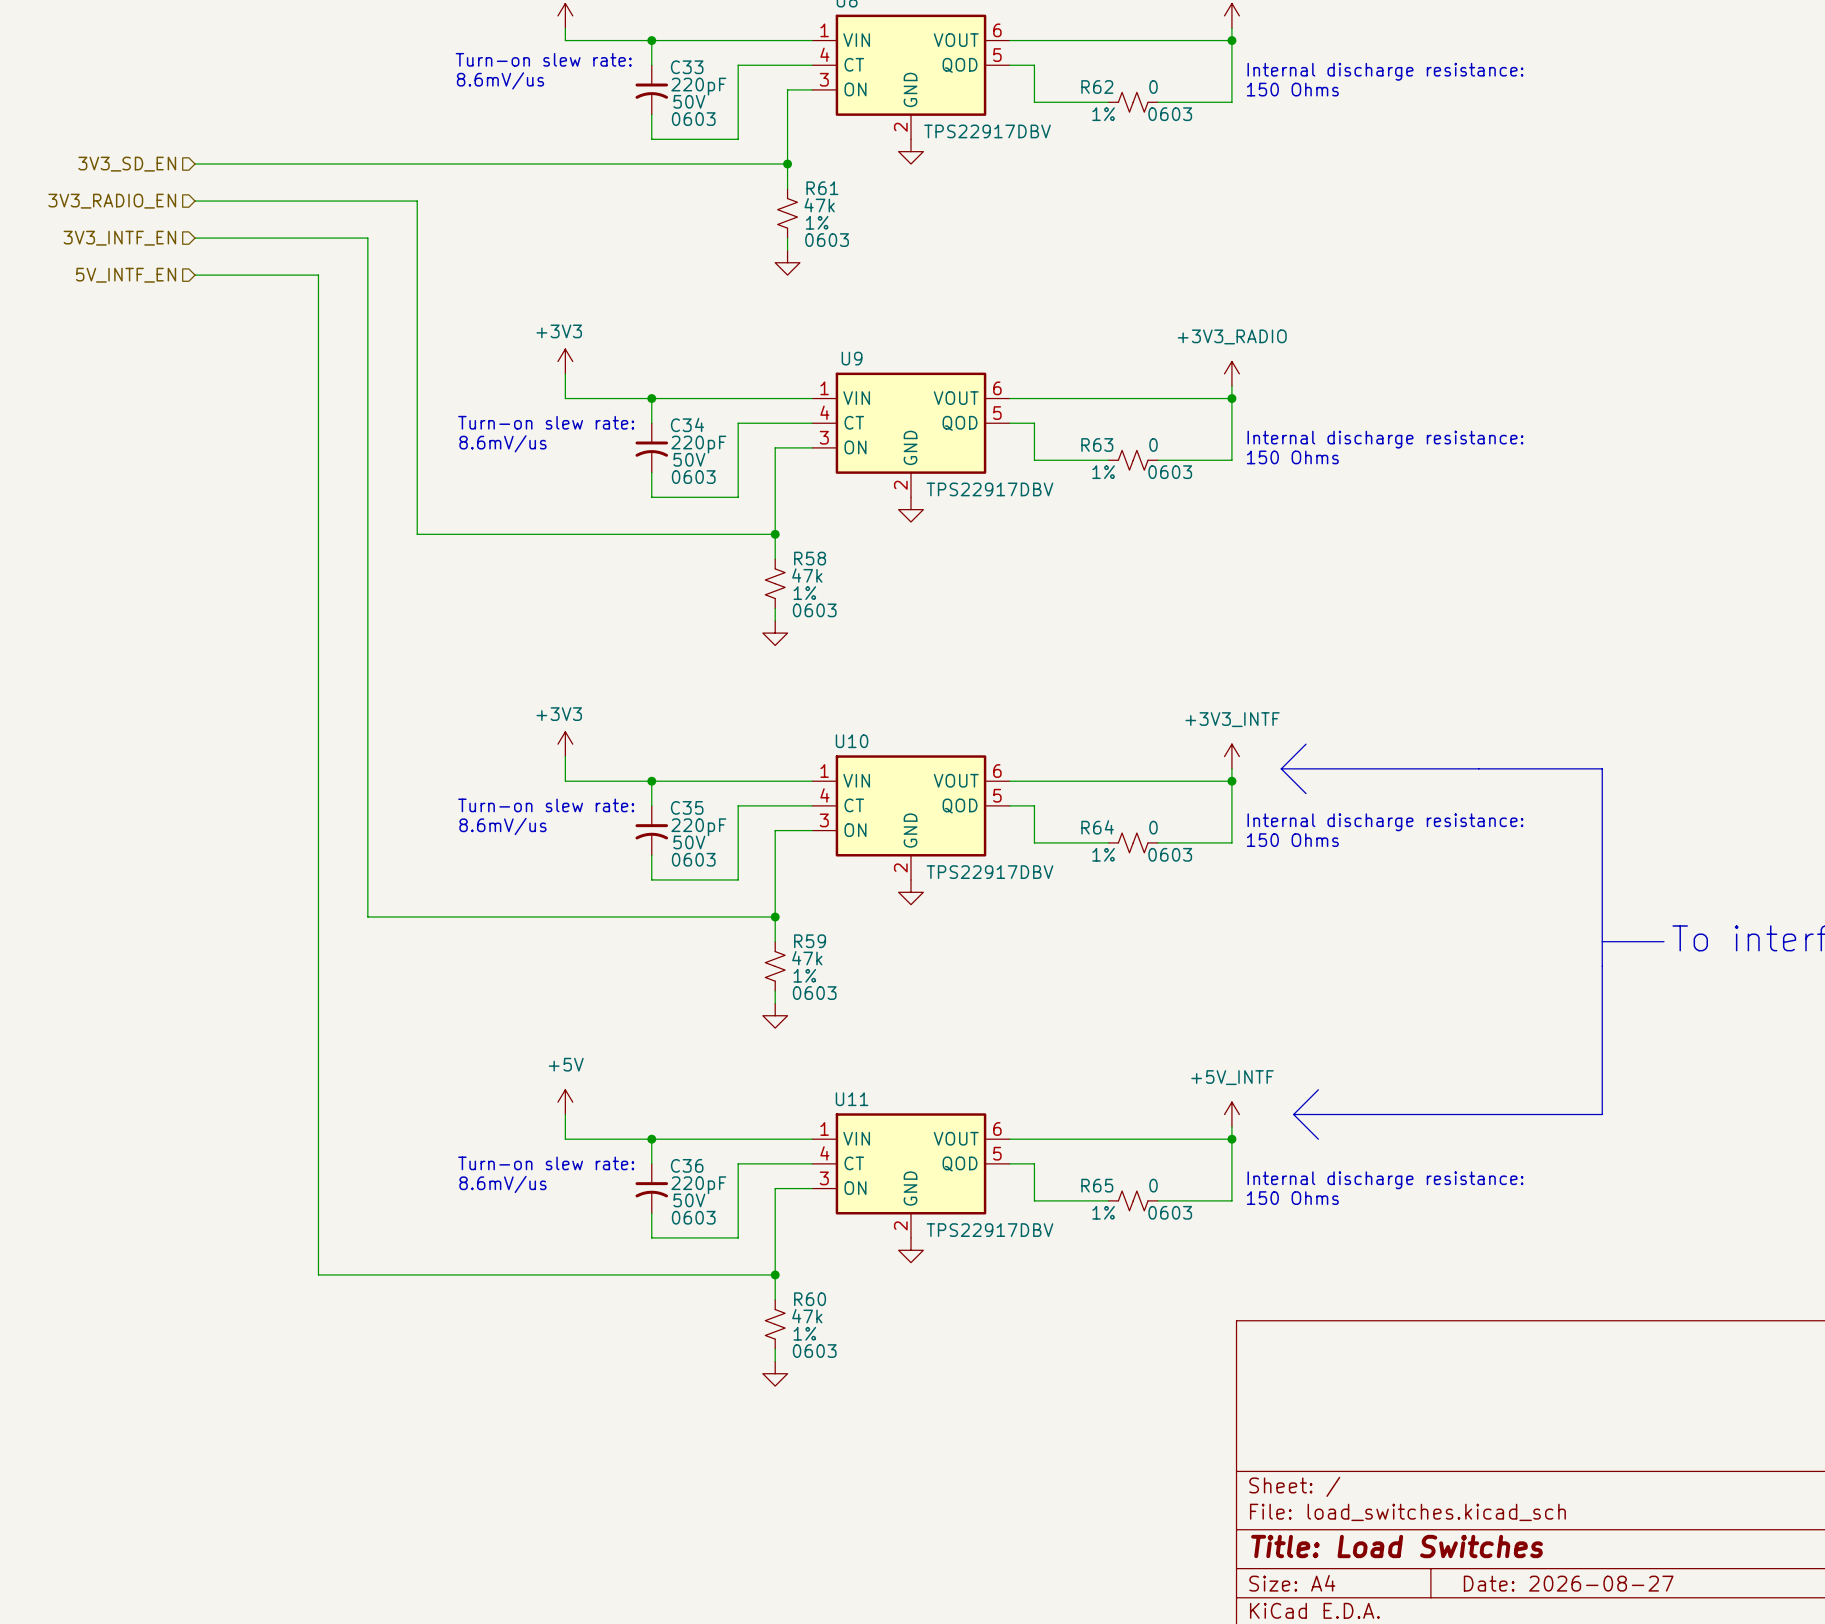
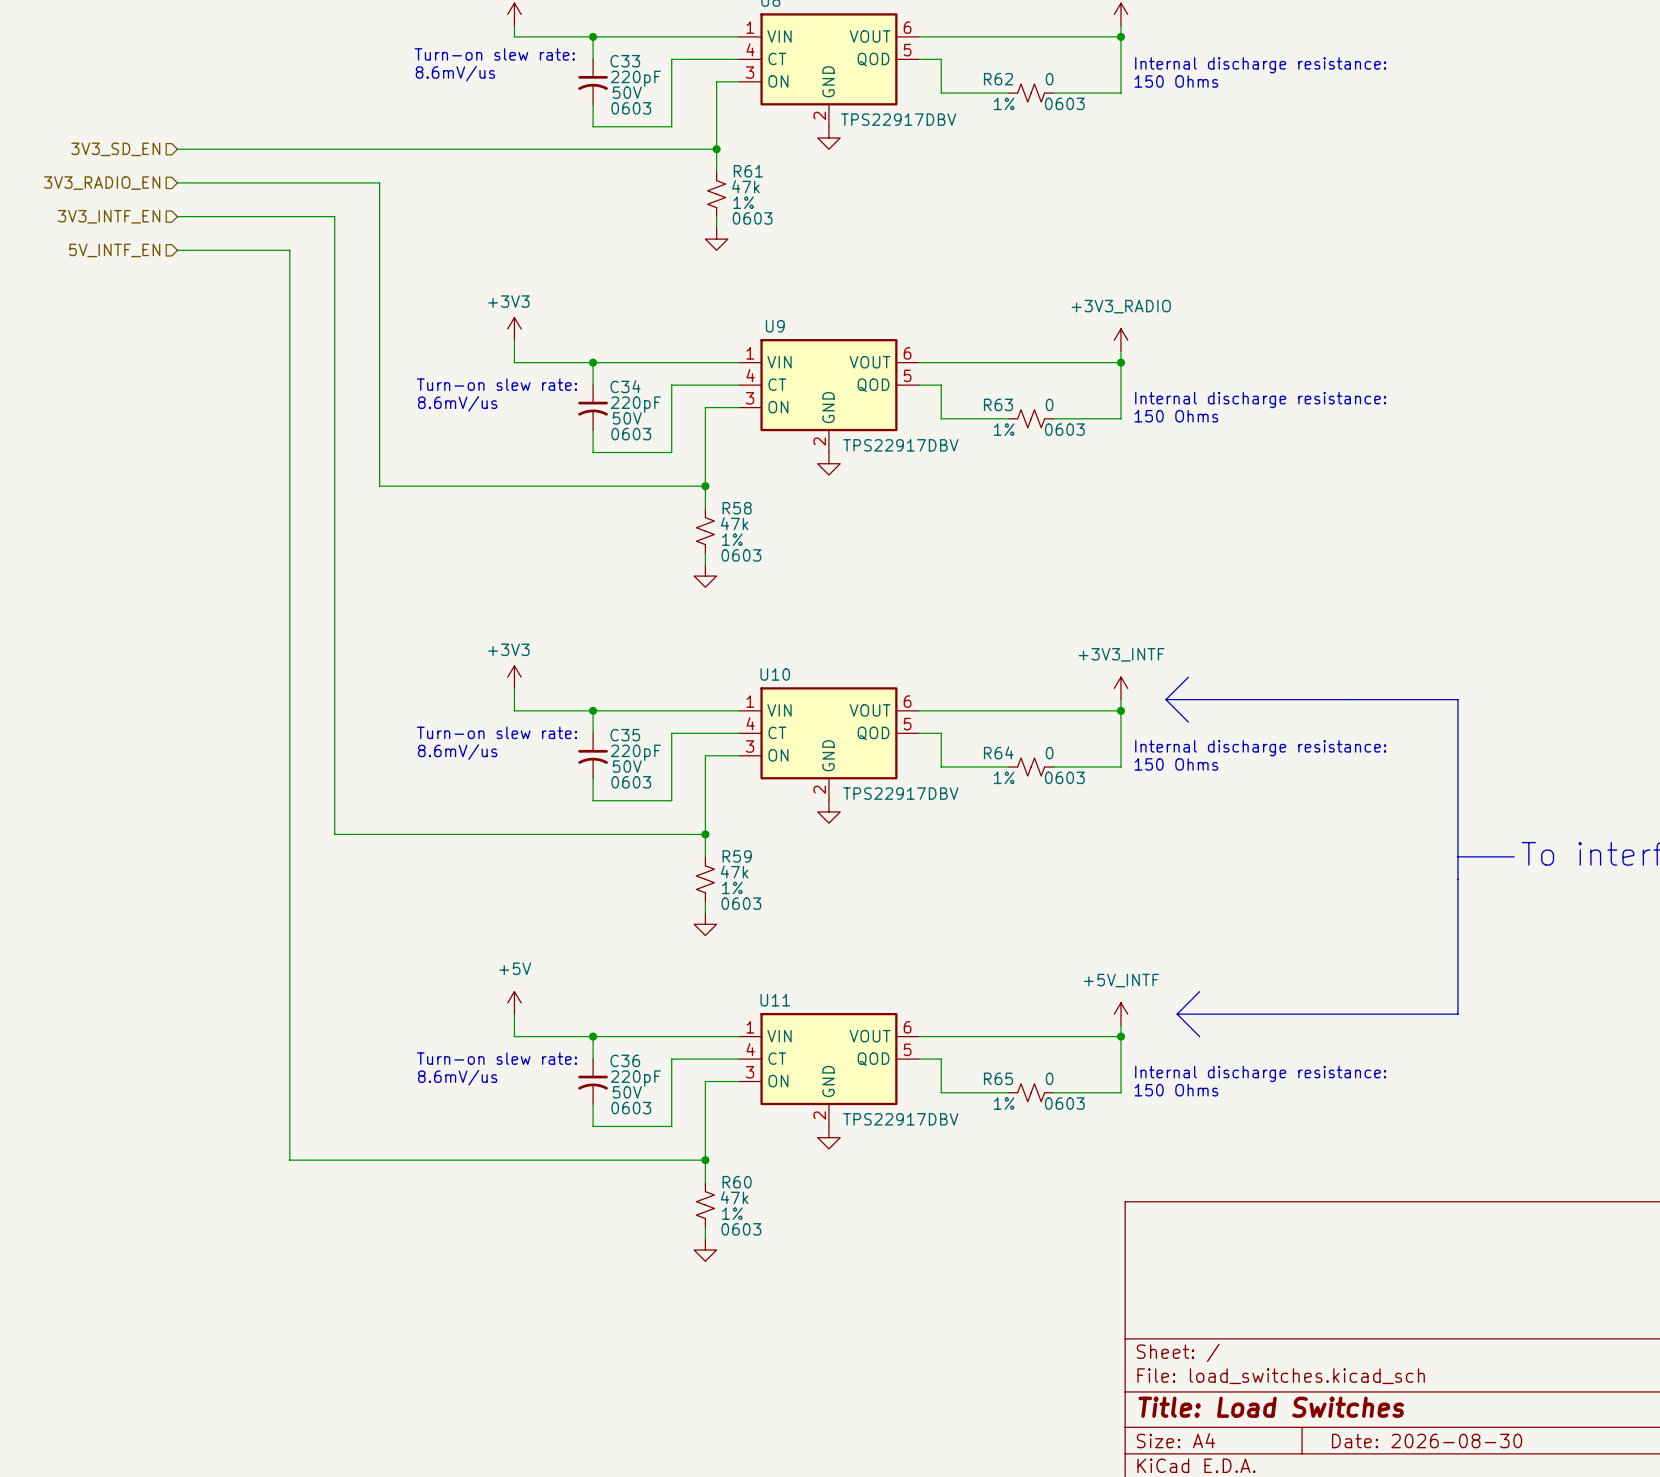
title block: Date: 2026-08-27 (1568, 1583) -> Date: 2026-08-30 (1427, 1441)

